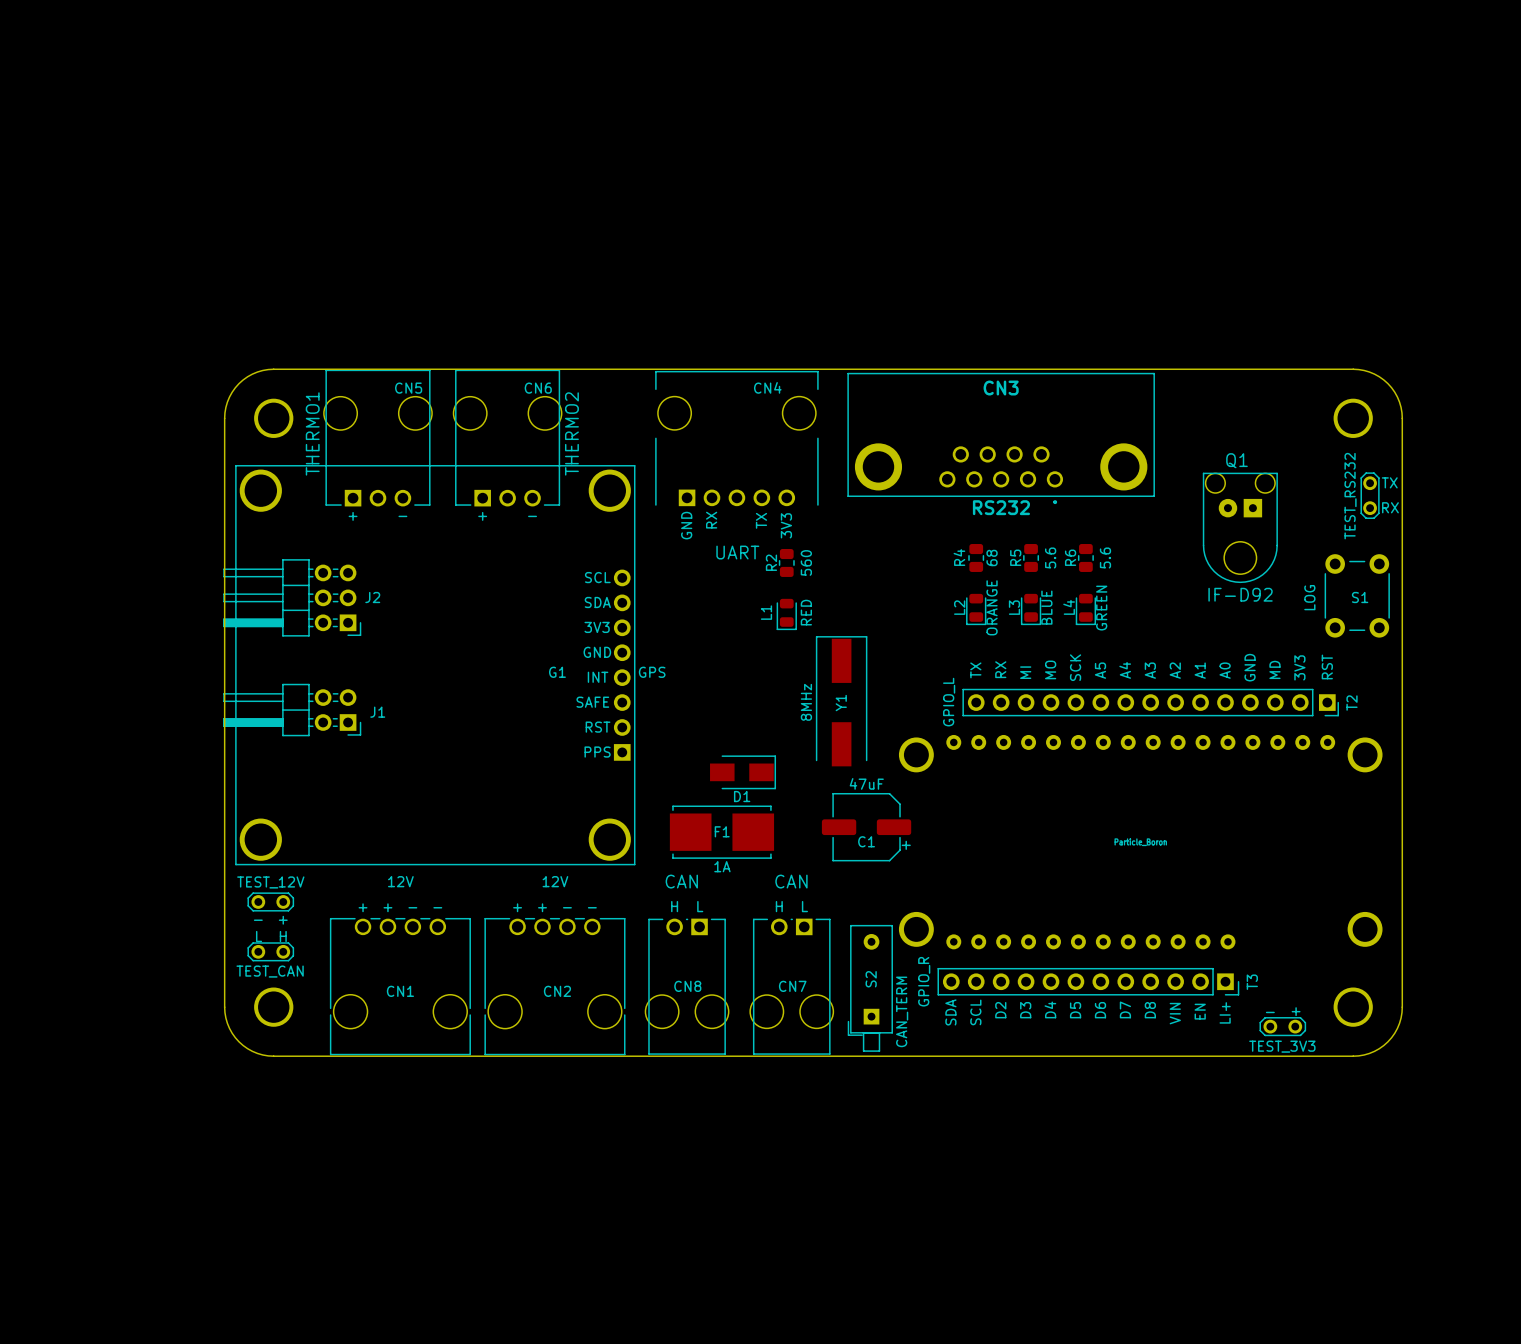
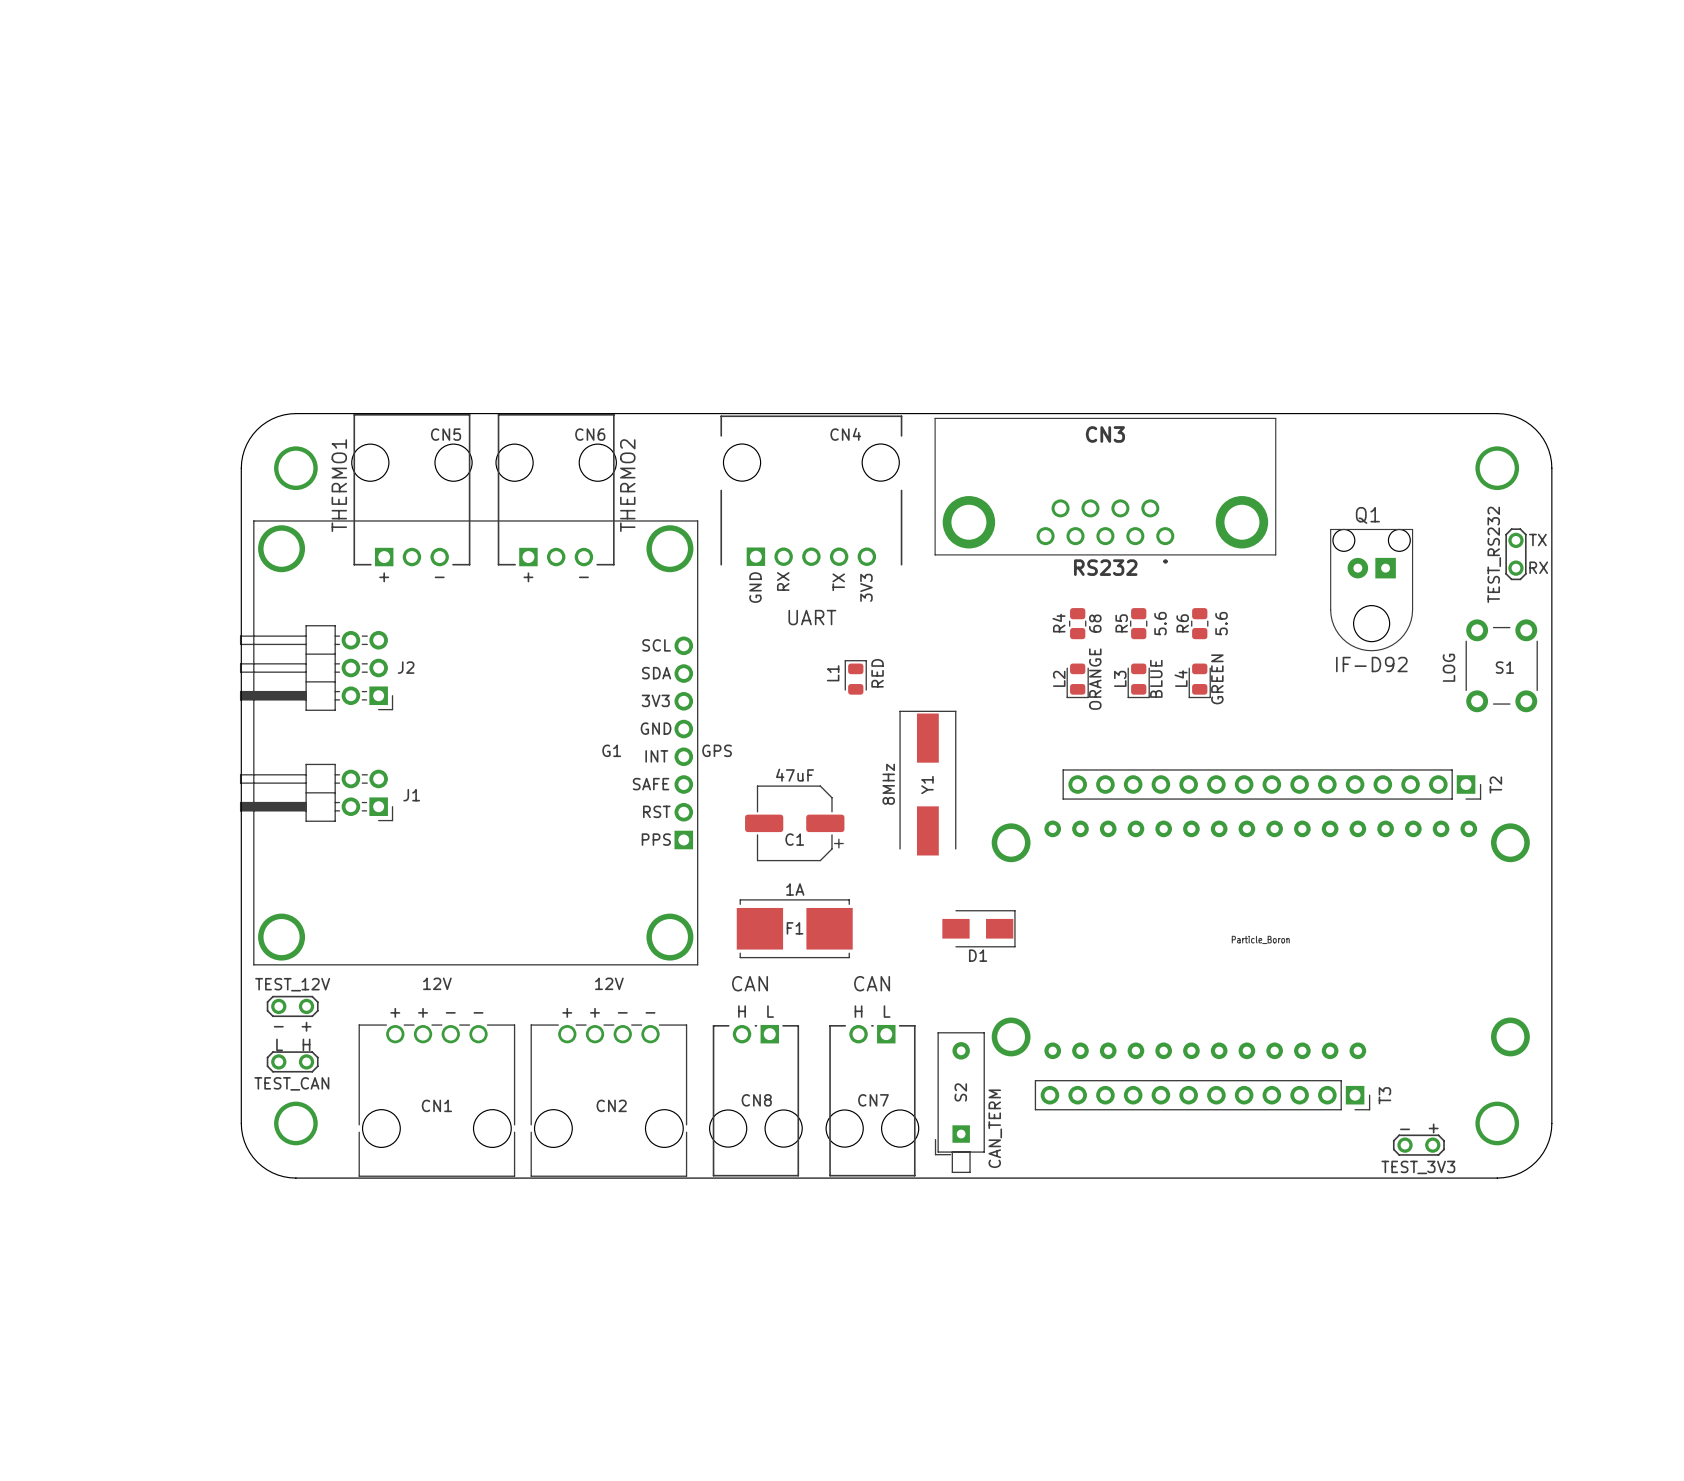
R2: 560 (786, 562) -> none
L1 rotation: 0° (786, 614) -> 180° (855, 677)
T2 footprint: [962, 688, 1339, 717] -> [1062, 769, 1482, 800]
T2 value: GPIO_L (949, 702) -> none
D1 position: (742, 772) -> (978, 928)
C1 position: (866, 827) -> (794, 823)
F1 value position: 1A (722, 866) -> 1A (795, 889)
T3 footprint: [937, 968, 1240, 996] -> [1034, 1080, 1371, 1111]
T3 value: GPIO_R (924, 981) -> none

